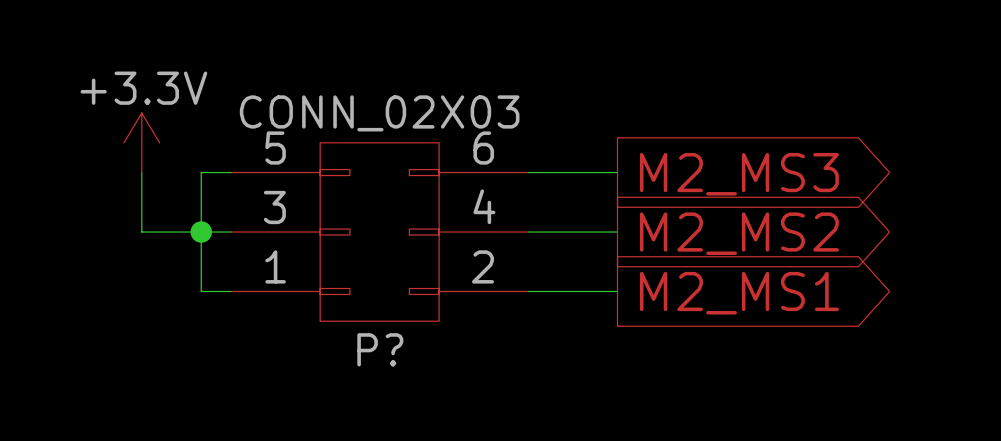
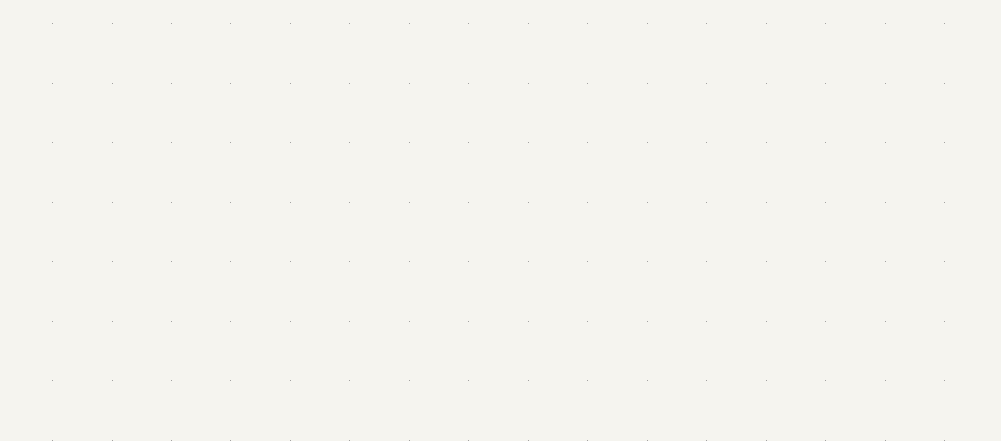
power symbol: +3.3V (141, 142) -> none
wire: (141, 172) (141, 232) (230, 232) -> none
wire: (230, 172) (201, 172) (201, 291) (230, 291) -> none
wire: (528, 172) (617, 172) -> none
global label: M2_MS3 (739, 174) -> none
junction: (201, 232) -> none
P?: CONN_02X03 (379, 232) -> none
wire: (528, 232) (617, 232) -> none
global label: M2_MS2 (739, 233) -> none
wire: (528, 291) (617, 291) -> none
global label: M2_MS1 (739, 293) -> none

